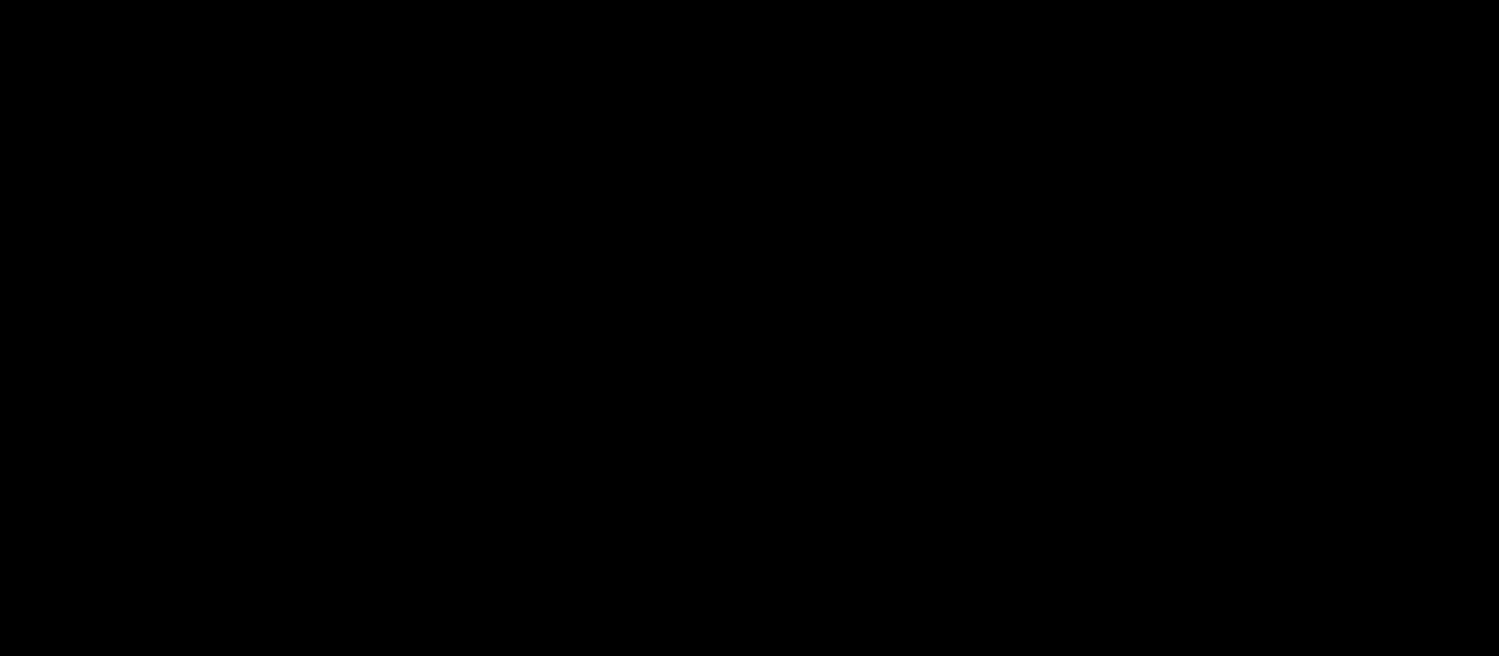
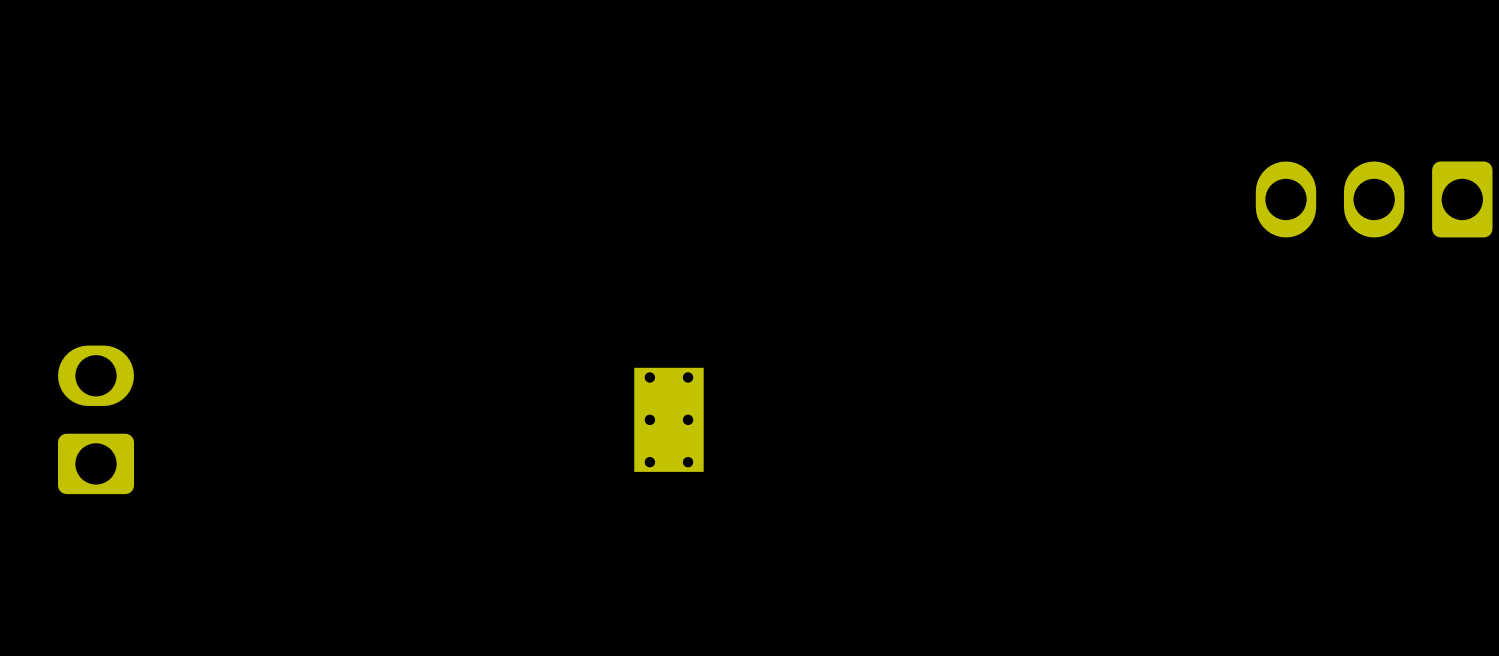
part: none -> (1374, 199)
part: none -> (96, 419)
part: none -> (668, 419)

